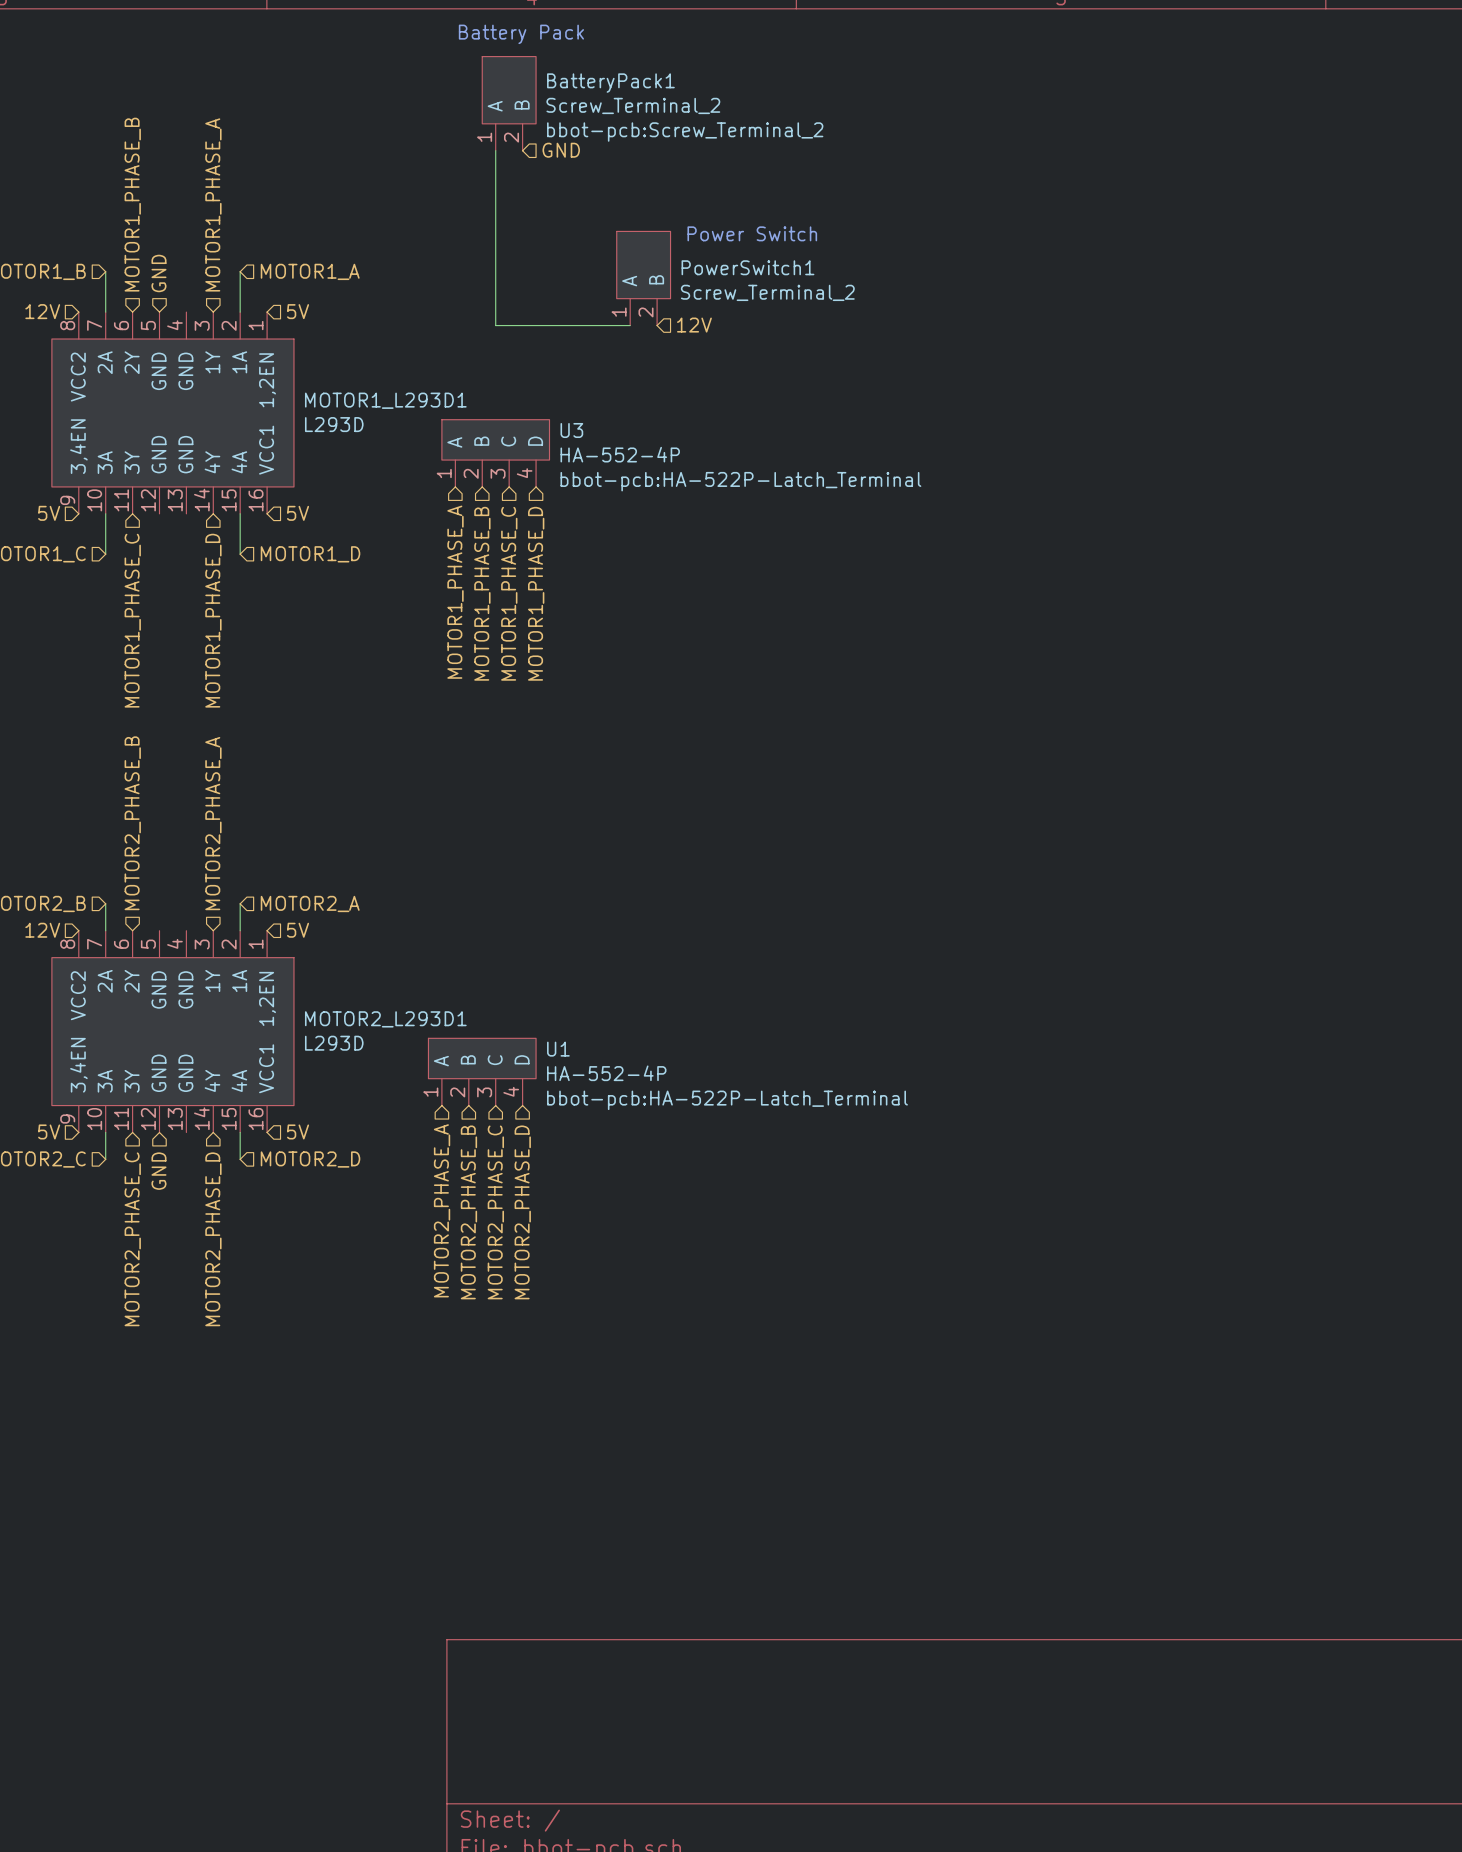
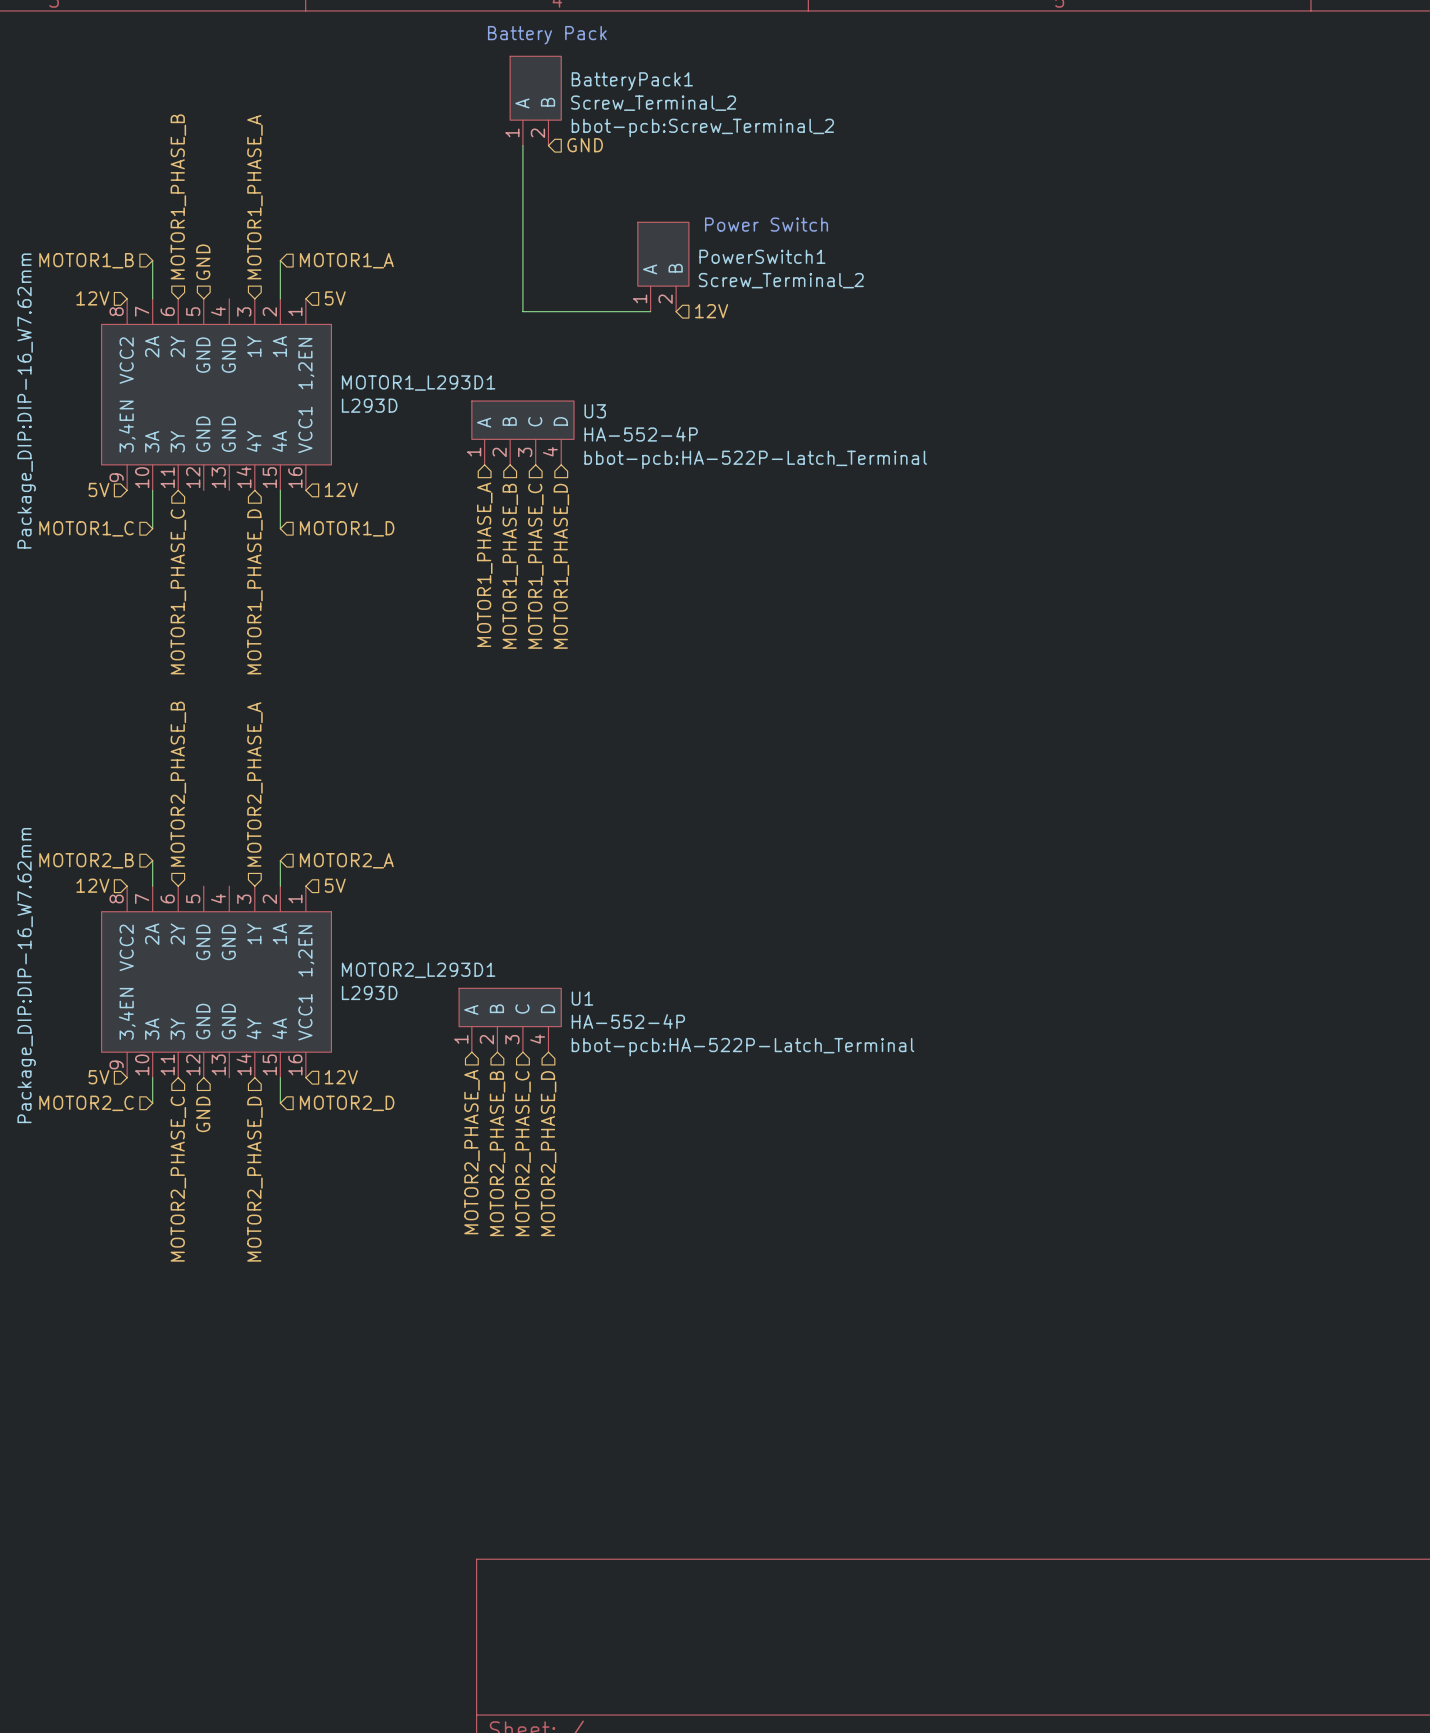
hierarchical label: 5V (298, 513) -> 12V (341, 489)
hierarchical label: 5V (298, 1131) -> 12V (341, 1077)

